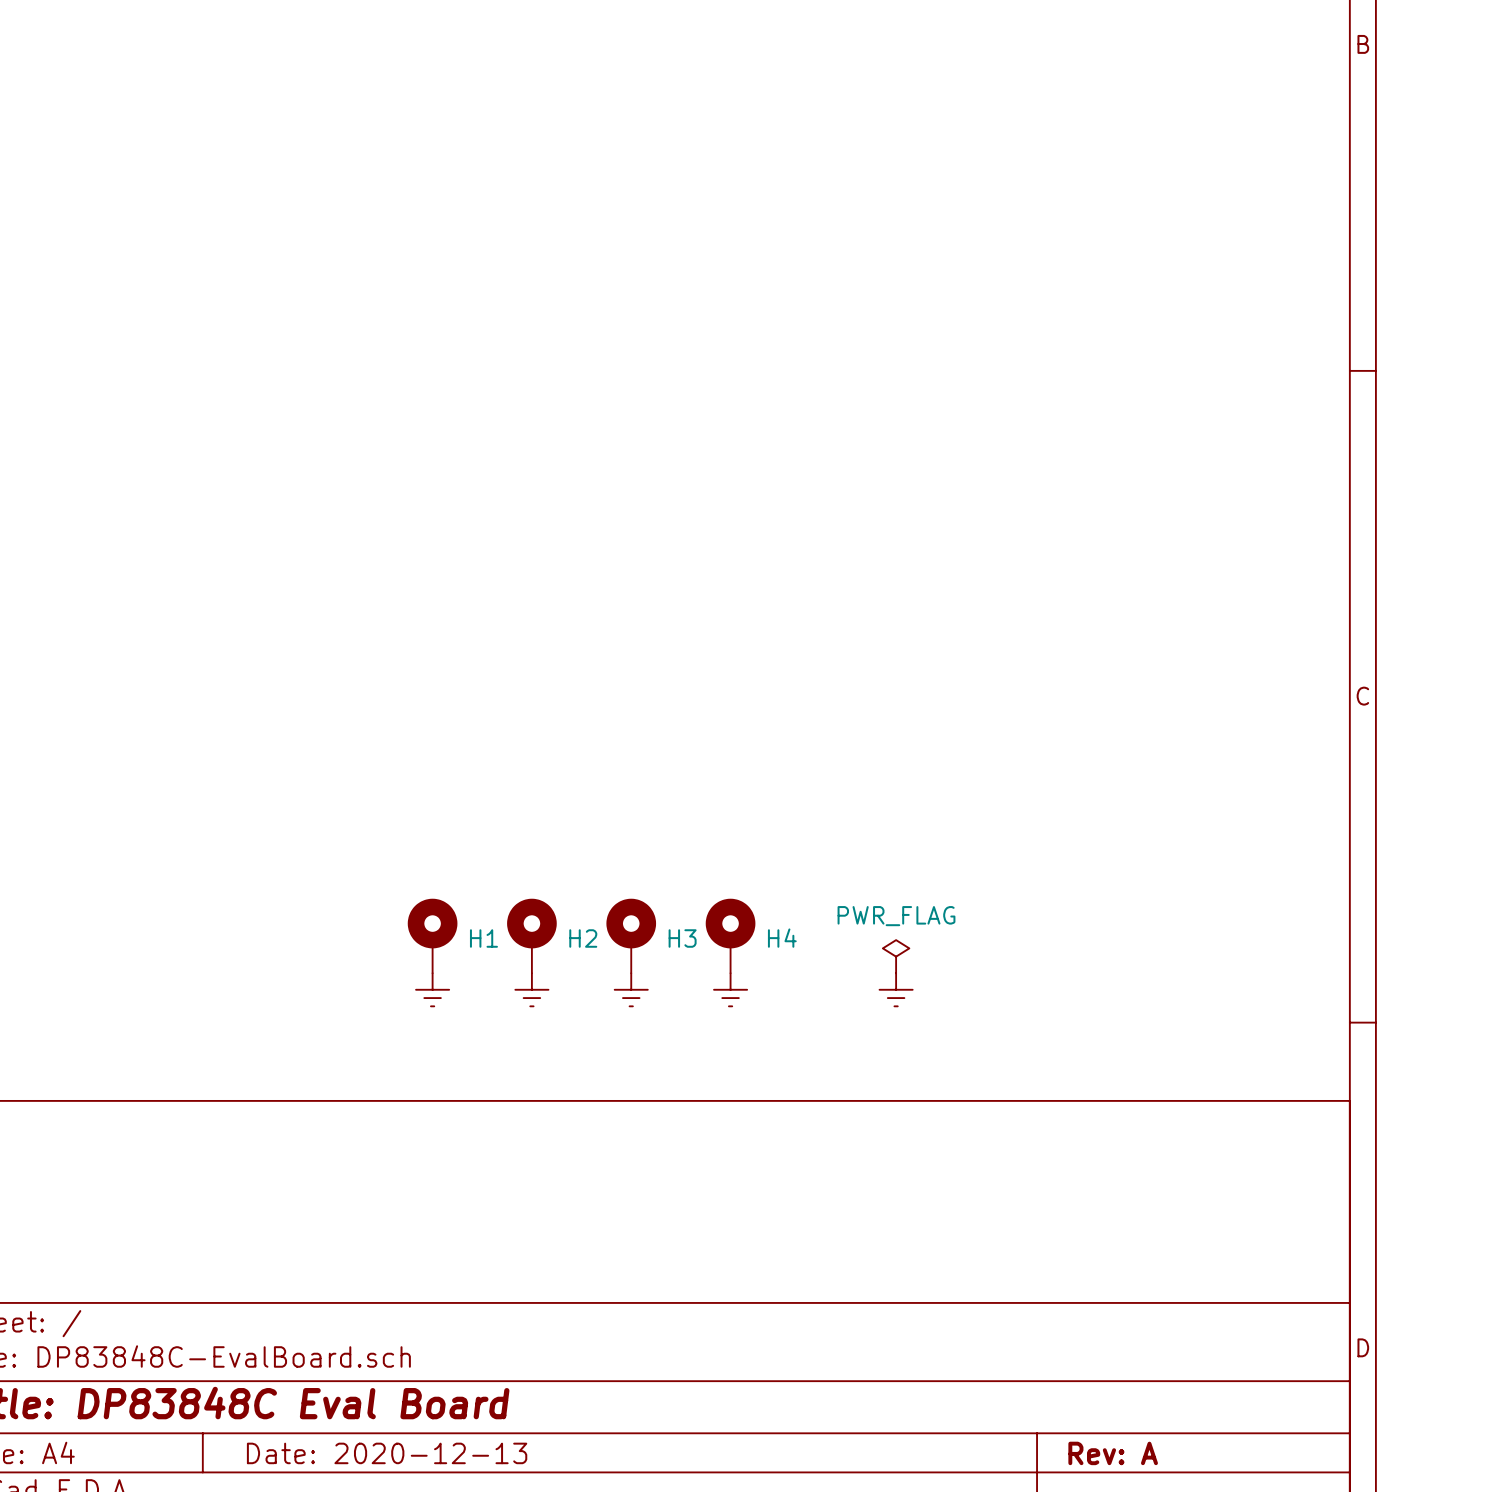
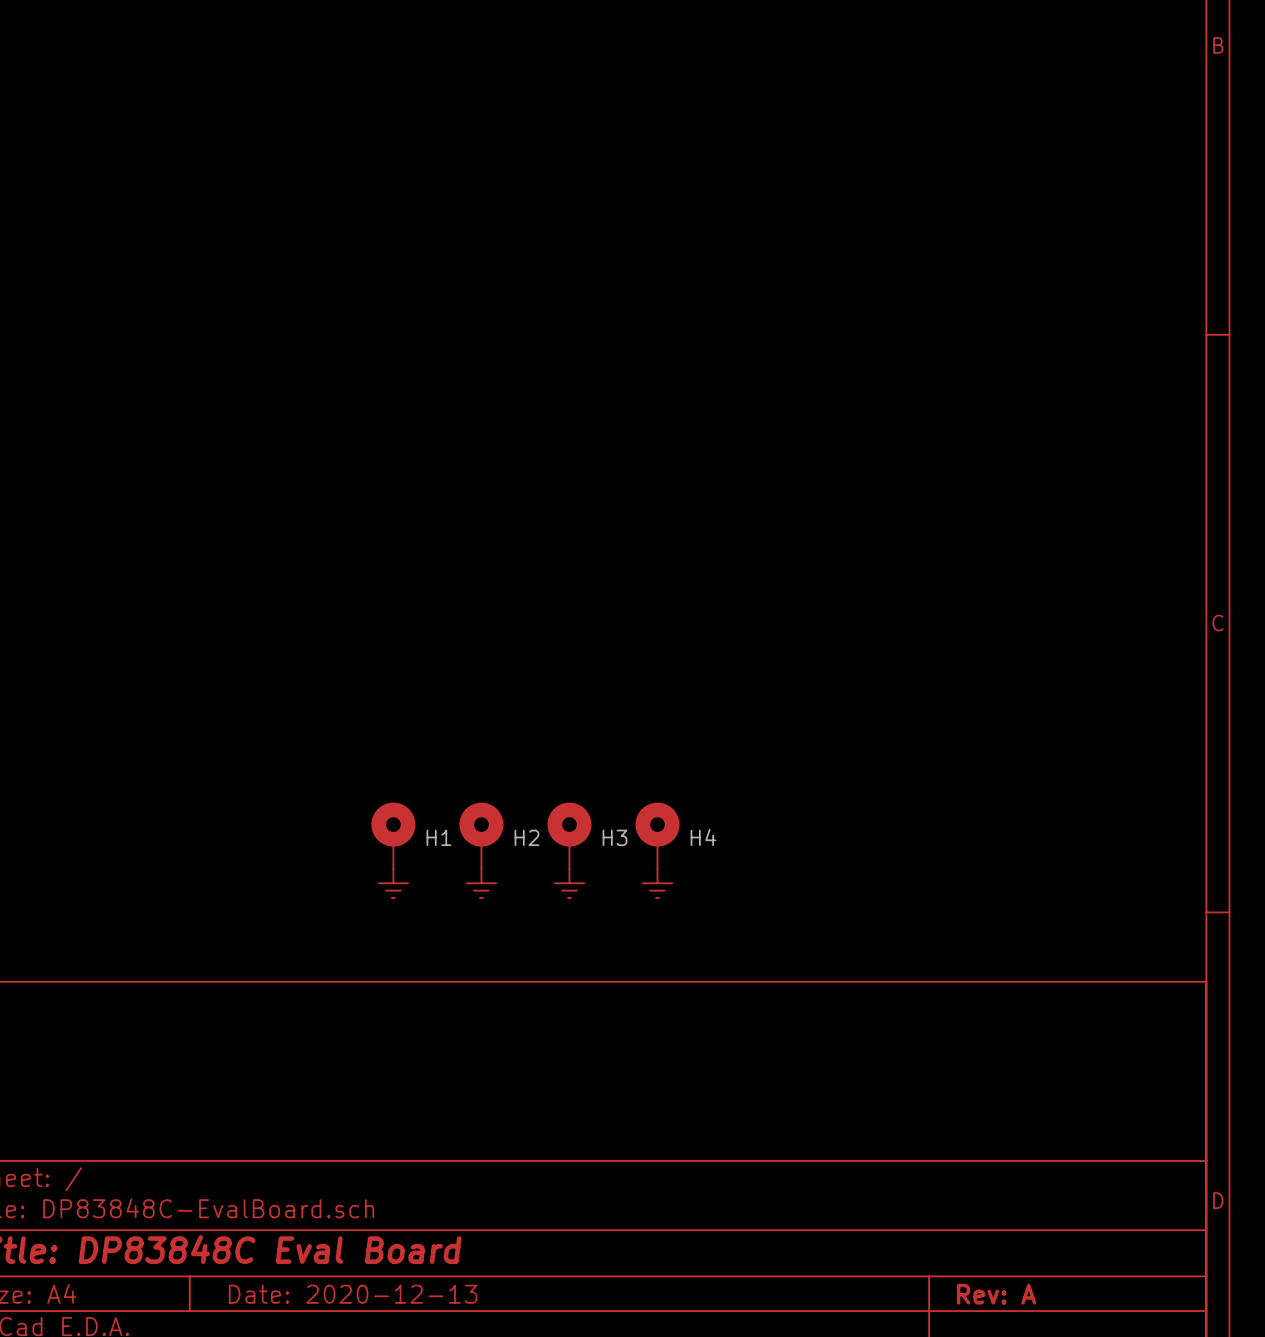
power symbol: PWR_FLAG (896, 956) -> none
power symbol: (896, 989) -> none

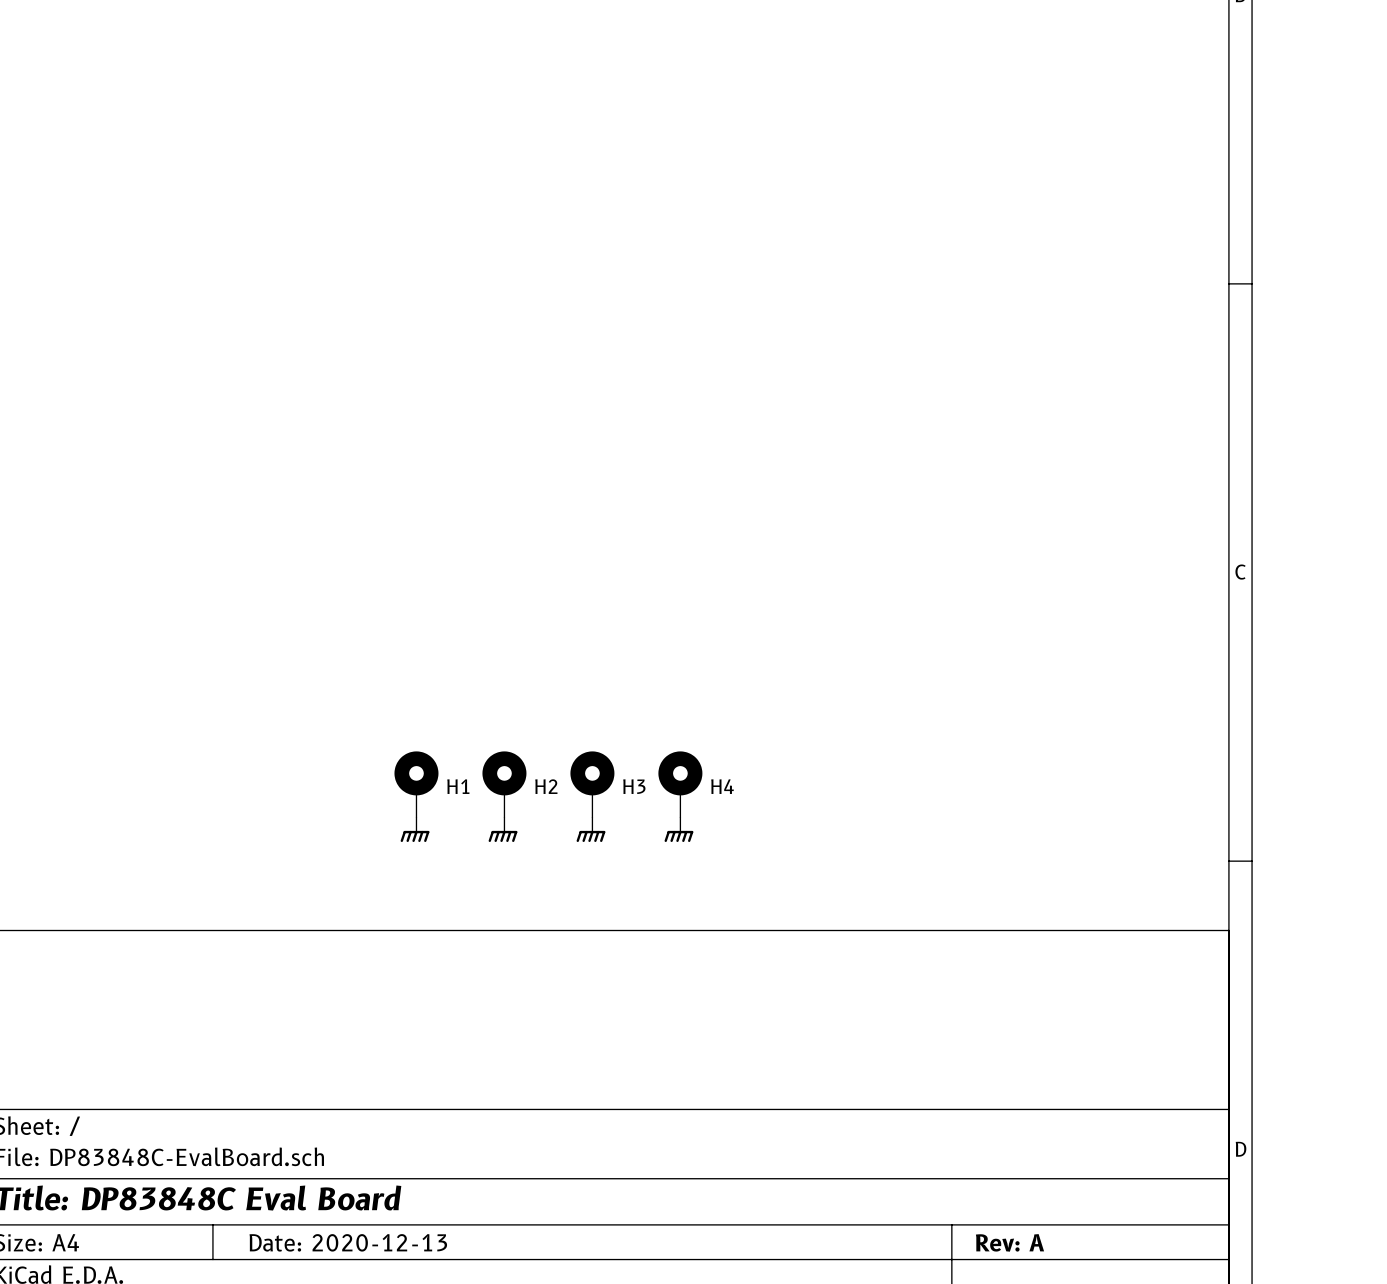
power symbol shape: [378, 868, 409, 898] -> [400, 817, 430, 843]
power symbol shape: [466, 868, 497, 898] -> [488, 817, 518, 843]
power symbol shape: [554, 868, 585, 898] -> [576, 817, 606, 843]
power symbol shape: [642, 868, 673, 898] -> [664, 817, 694, 843]

